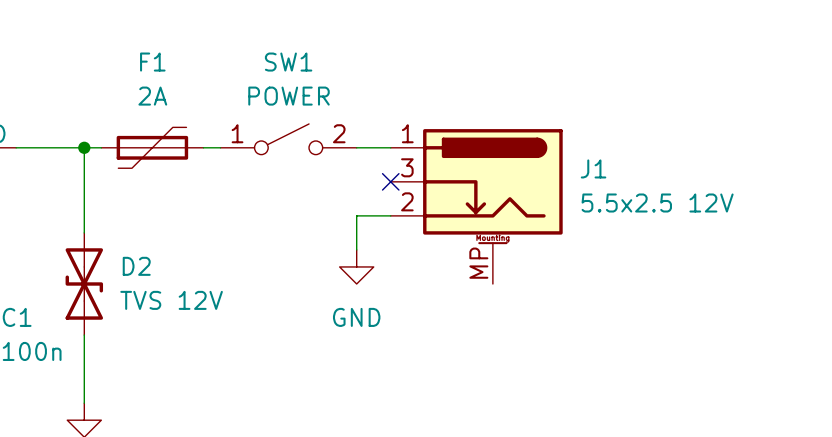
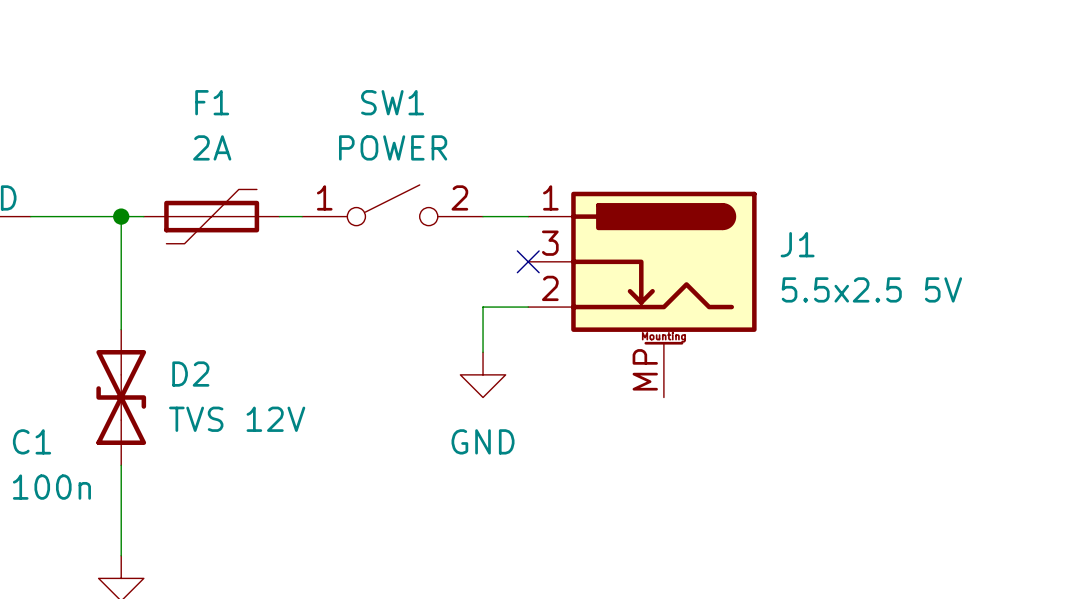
J1 value: 5.5x2.5 12V (657, 203) -> 5.5x2.5 5V (871, 289)

